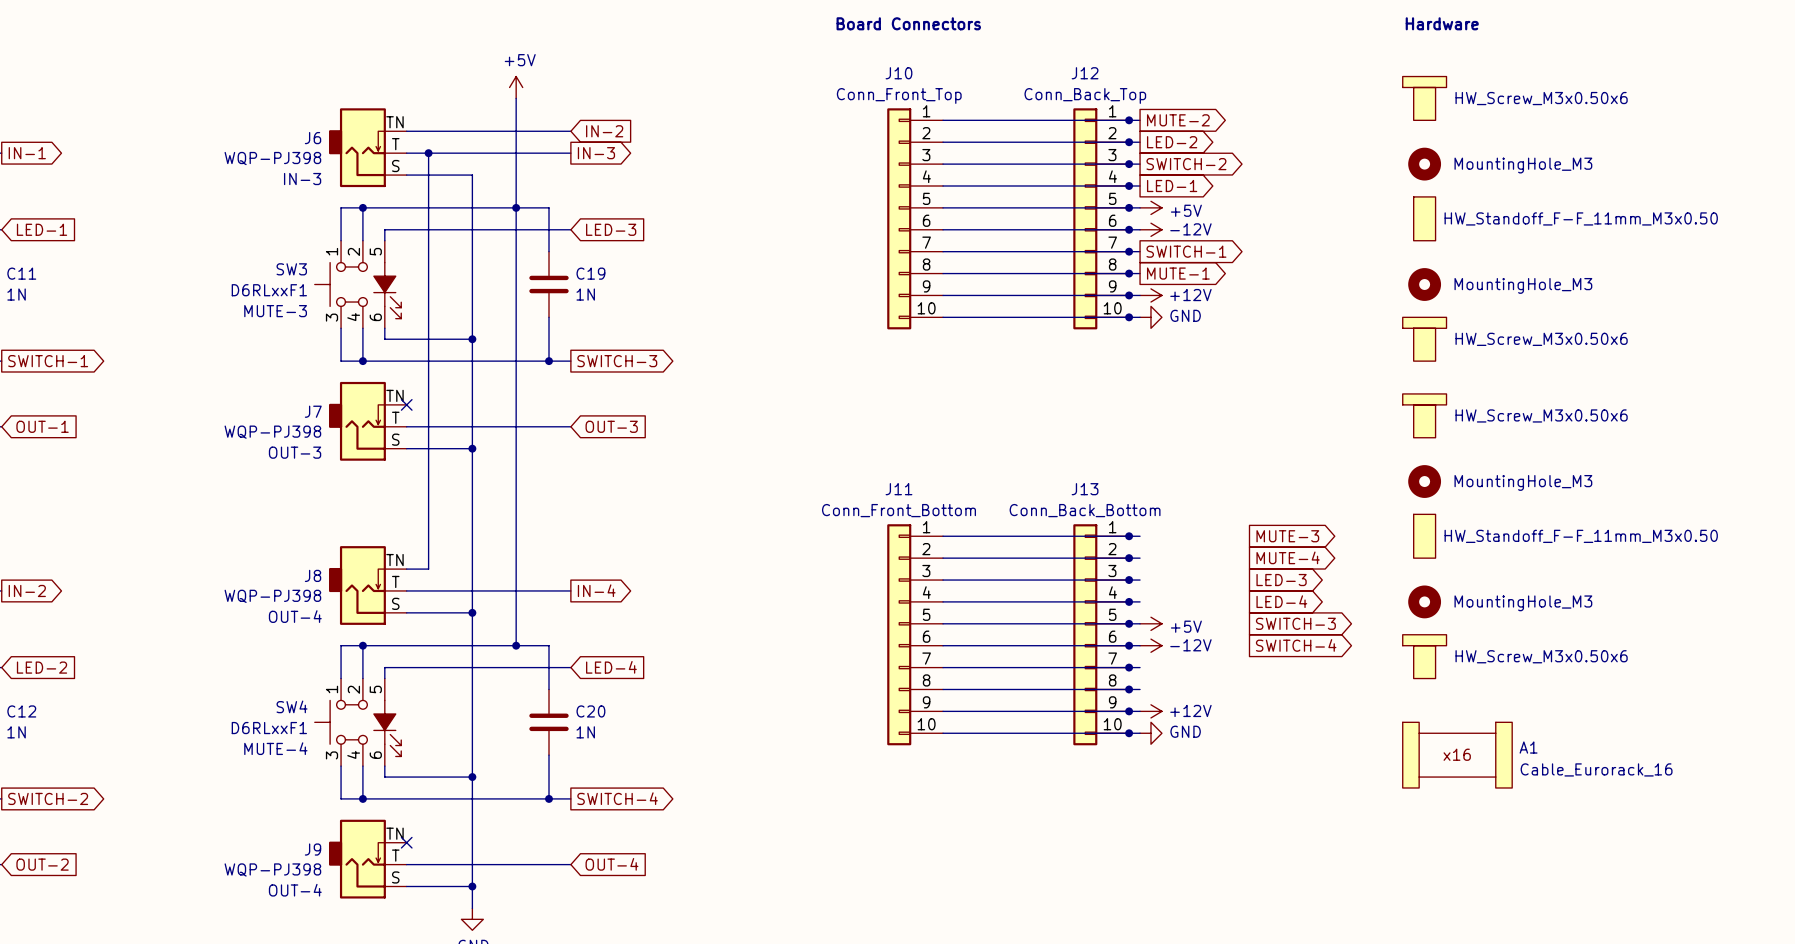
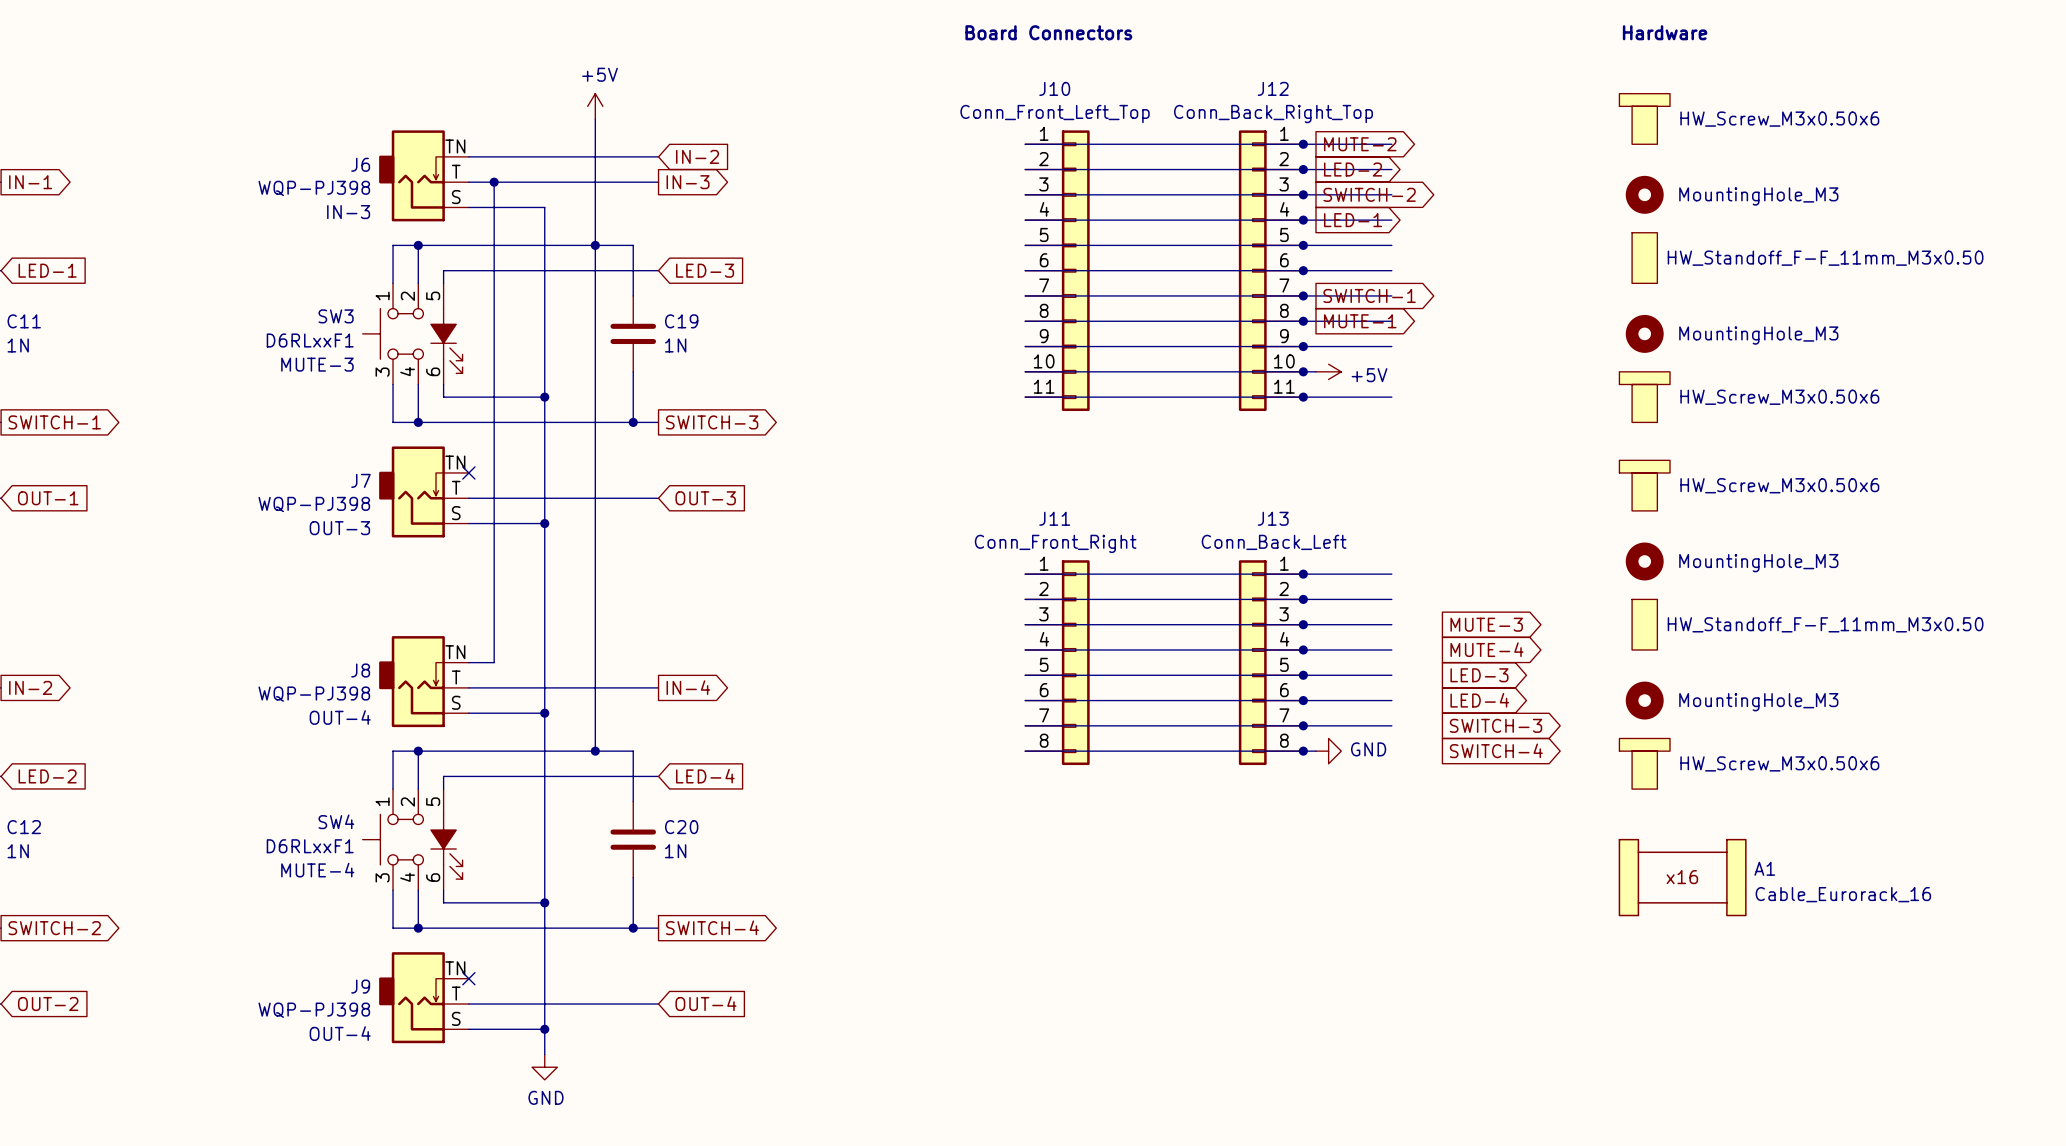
J10 name position: J10 (898, 73) -> J10 (1054, 88)
J12 name position: J12 (1085, 73) -> J12 (1273, 88)
J10 value: Conn_Front_Top (899, 95) -> Conn_Front_Left_Top (1055, 114)
J12 value: Conn_Back_Top (1085, 95) -> Conn_Back_Right_Top (1273, 114)
J10 symbol: [887, 108, 944, 330] -> [1025, 130, 1090, 412]
J12 symbol: [1073, 108, 1130, 330] -> [1238, 130, 1304, 412]
wire: none -> (1315, 144) (1391, 144)
wire: none -> (1315, 169) (1391, 169)
wire: none -> (1315, 194) (1391, 194)
wire: none -> (1315, 220) (1391, 220)
wire: none -> (1315, 245) (1391, 245)
power symbol: +5V (1150, 207) -> none
wire: none -> (1315, 270) (1391, 270)
power symbol: -12V (1150, 229) -> none
wire: none -> (1315, 295) (1391, 295)
wire: none -> (1315, 321) (1391, 321)
wire: none -> (1315, 346) (1391, 346)
power symbol: +12V (1150, 295) -> none
power symbol: GND (1150, 317) -> +5V (1328, 371)
wire: none -> (1025, 397) (1391, 397)
junction: none -> (1303, 397)
J11 name position: J11 (898, 489) -> J11 (1054, 518)
J13 name position: J13 (1085, 489) -> J13 (1273, 518)
wire: none -> (1025, 574) (1391, 574)
junction: none -> (1303, 574)
J11 value: Conn_Front_Bottom (898, 510) -> Conn_Front_Right (1055, 543)
J13 value: Conn_Back_Bottom (1085, 510) -> Conn_Back_Left (1274, 542)
wire: none -> (1025, 599) (1391, 599)
junction: none -> (1303, 599)
J11 symbol: [887, 524, 944, 746] -> [1025, 560, 1090, 766]
J13 symbol: [1073, 524, 1130, 746] -> [1238, 560, 1304, 766]
wire: none -> (1315, 624) (1391, 624)
wire: none -> (1315, 649) (1391, 649)
wire: none -> (1315, 675) (1391, 675)
wire: none -> (1315, 700) (1391, 700)
wire: none -> (1315, 725) (1391, 725)
power symbol: +5V (1150, 623) -> none
power symbol: -12V (1150, 645) -> GND (1328, 751)
wire: (943, 667) (1140, 667) -> none
junction: (1129, 667) -> none
wire: (943, 689) (1140, 689) -> none
junction: (1129, 689) -> none
wire: (943, 711) (1140, 711) -> none
junction: (1129, 711) -> none
power symbol: +12V (1150, 711) -> none
wire: (943, 733) (1140, 733) -> none
junction: (1129, 733) -> none
power symbol: GND (1150, 733) -> none

